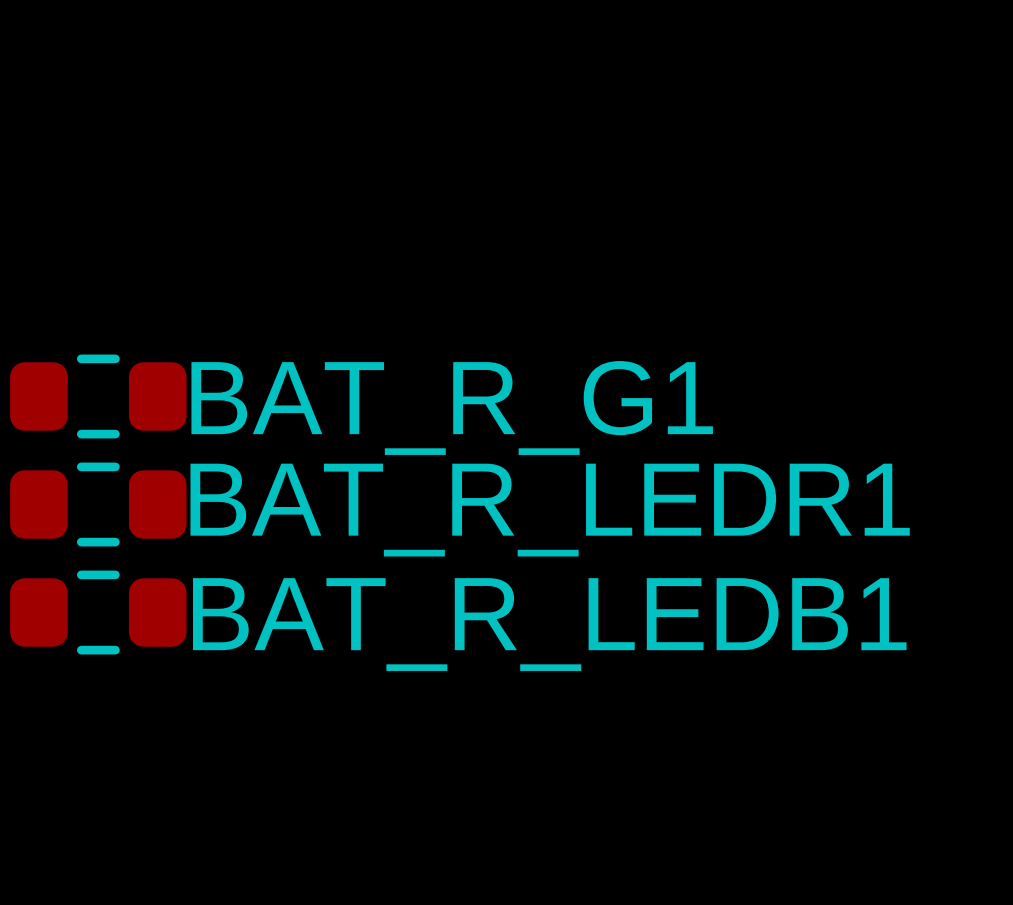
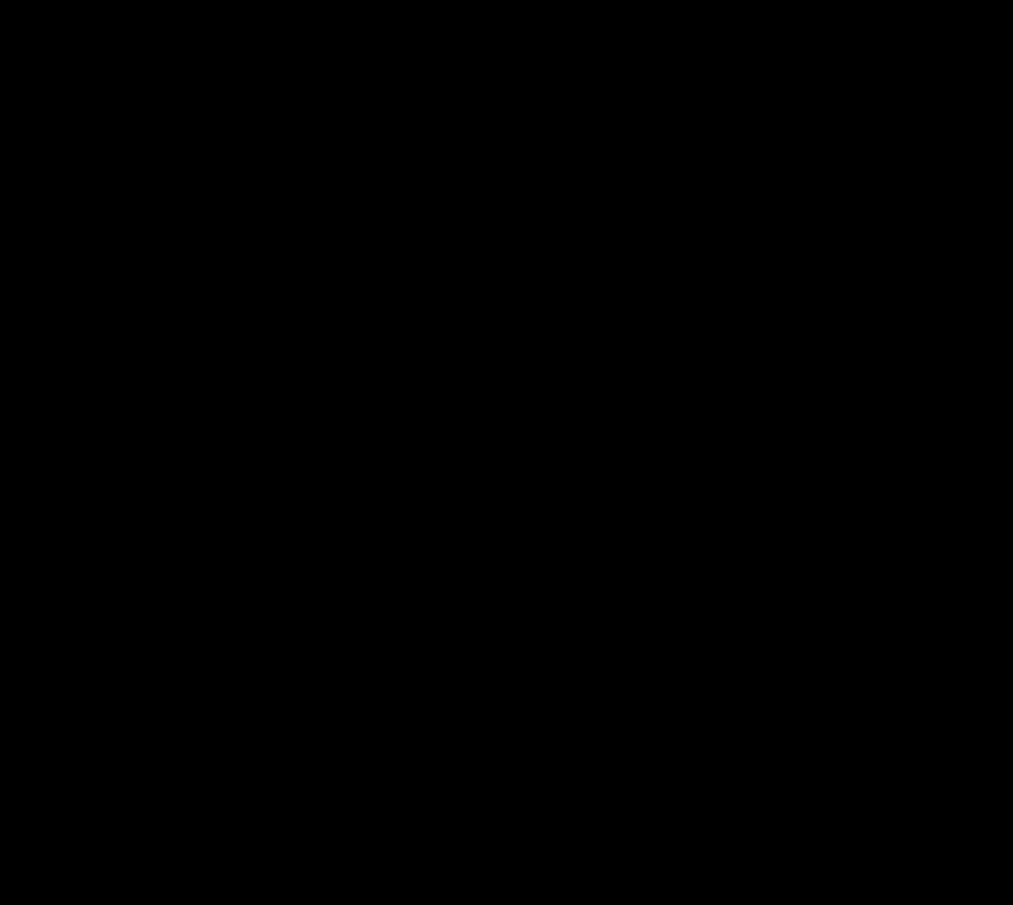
BAT_R_G1: (98, 396) -> none
BAT_R_LEDR1: (98, 504) -> none
BAT_R_LEDB1: (98, 612) -> none

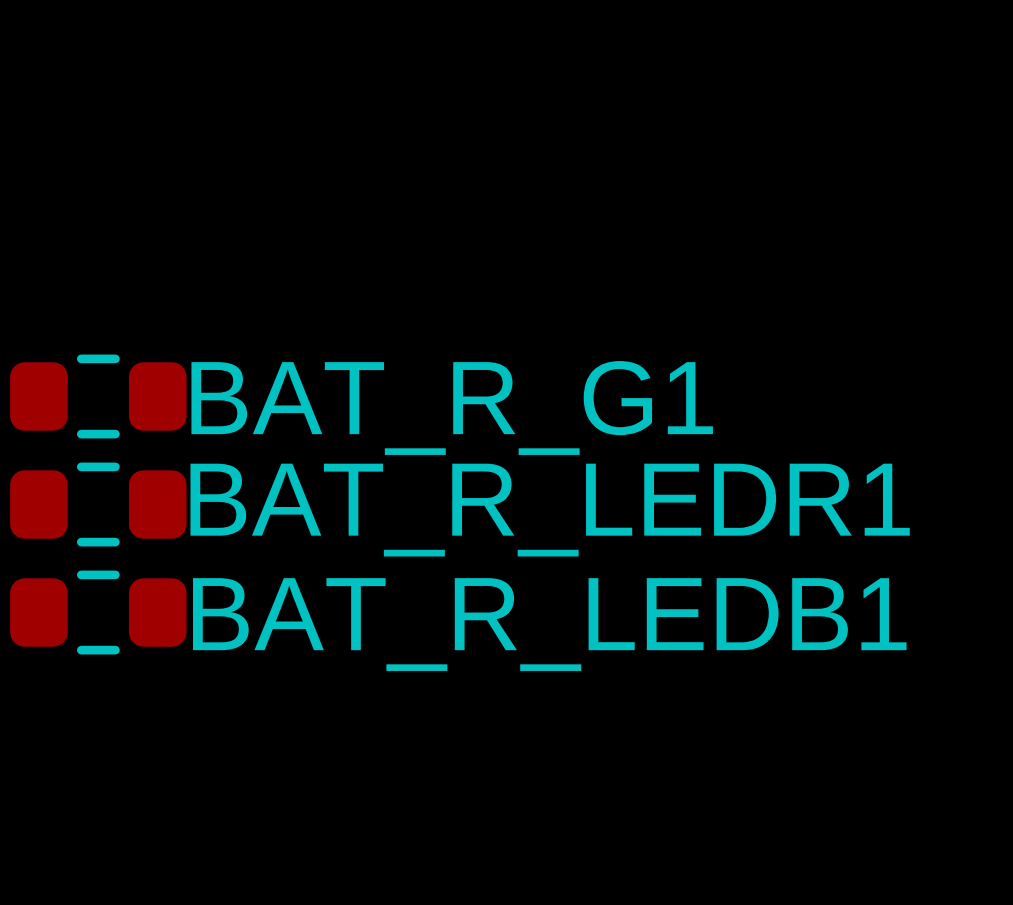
BAT_R_G1: none -> (98, 396)
BAT_R_LEDR1: none -> (98, 504)
BAT_R_LEDB1: none -> (98, 612)

